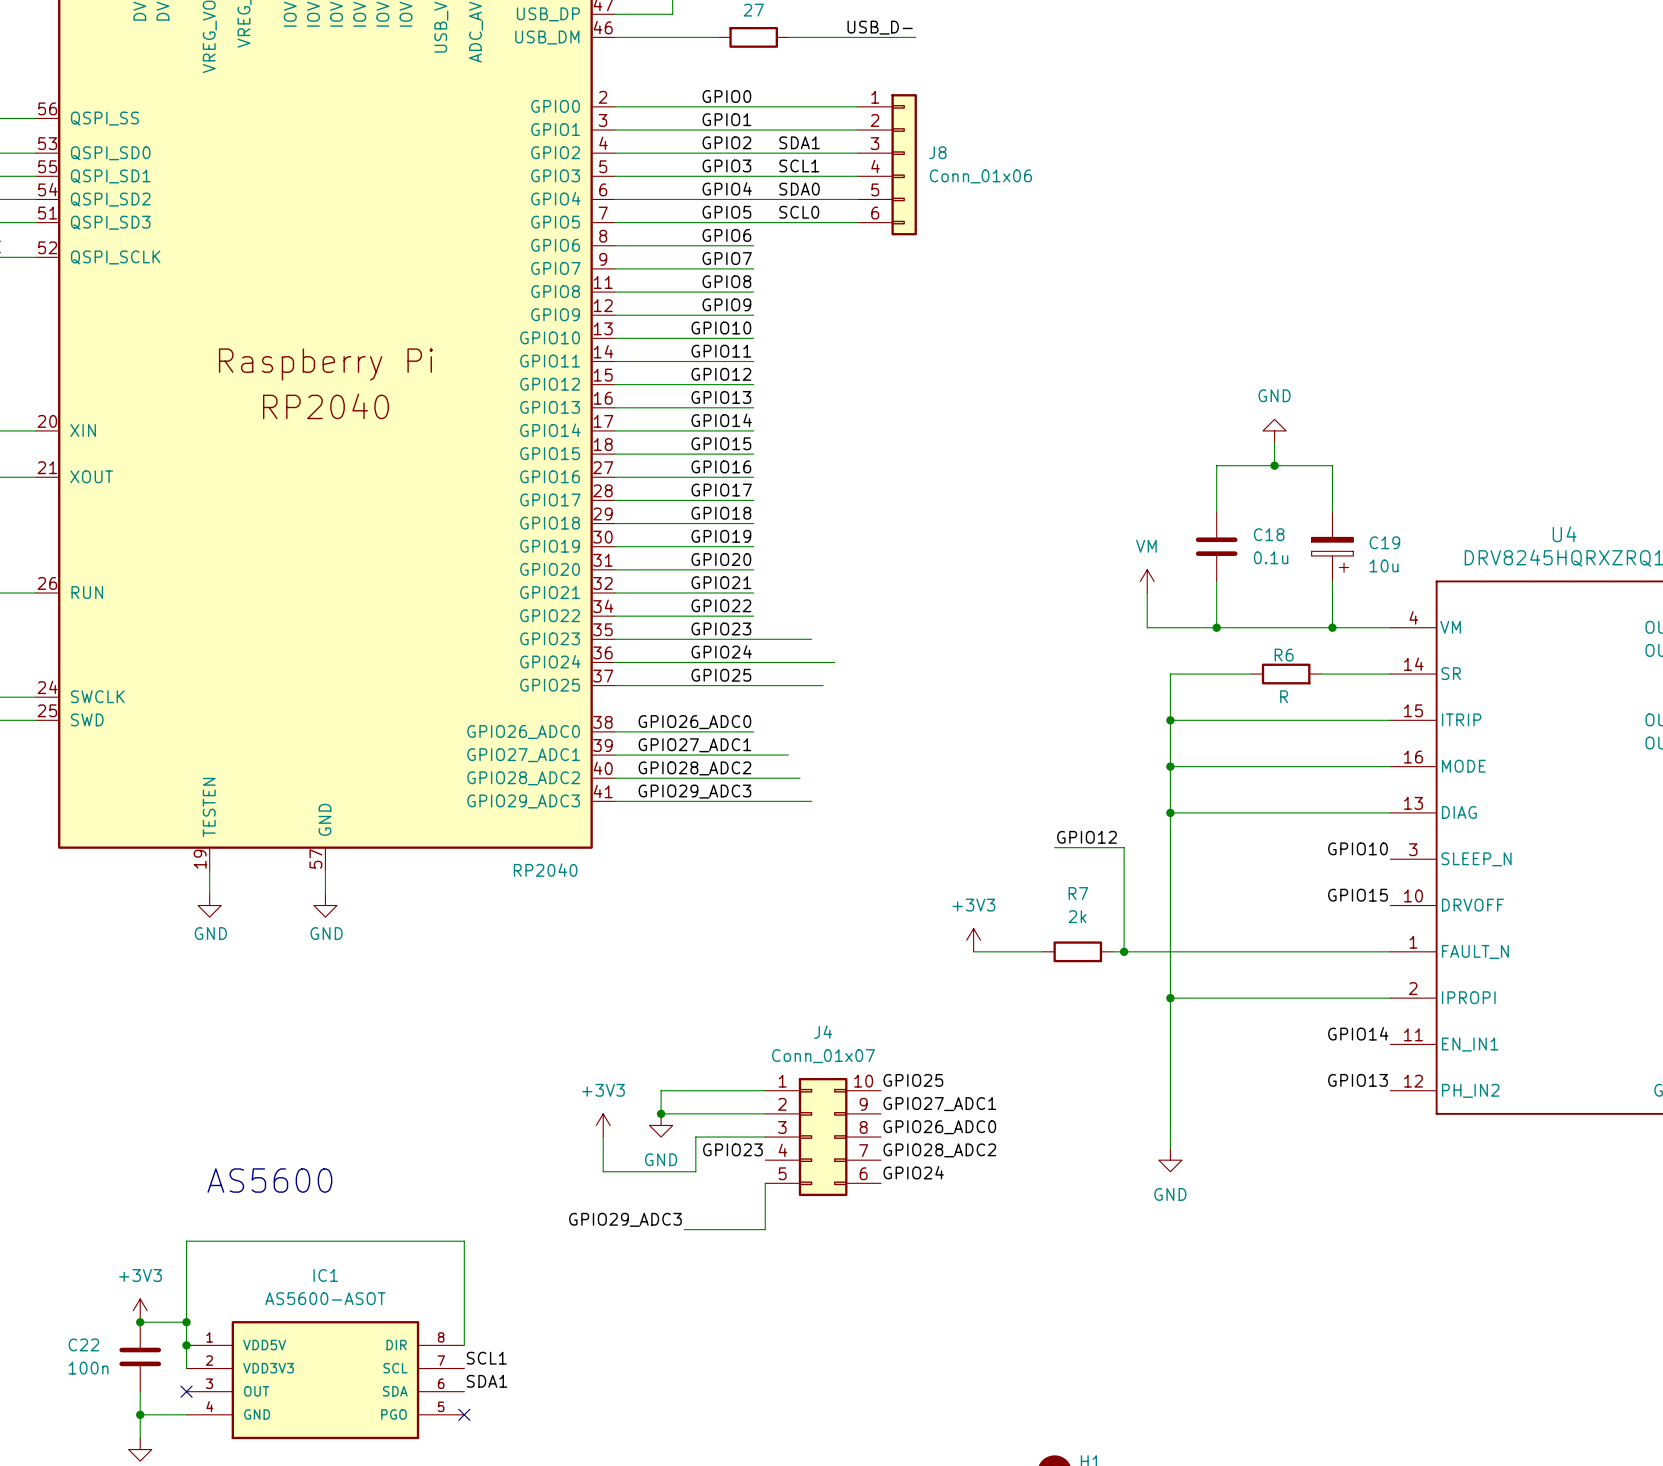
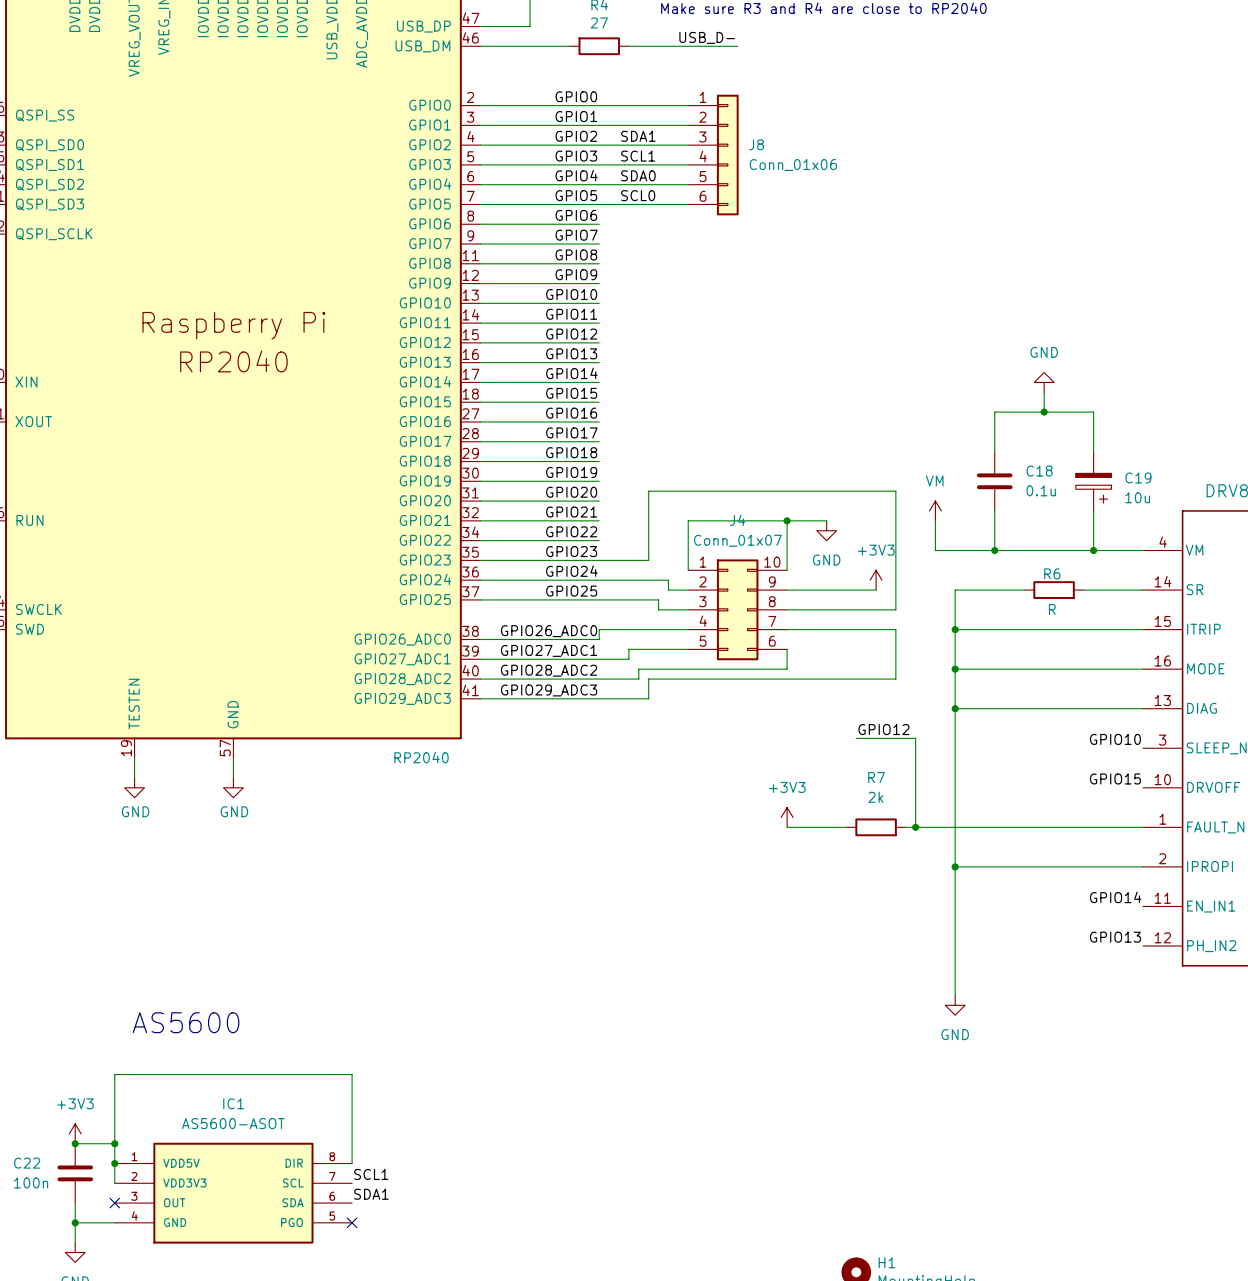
wire: none -> (787, 520) (787, 570)
junction: none -> (787, 520)
wire: none -> (826, 520) (688, 520) (688, 570)
power symbol: none -> GND (826, 530)
wire: none -> (648, 560) (648, 491) (895, 491) (895, 609) (787, 609)
wire: none -> (668, 580) (668, 590) (688, 590)
power symbol: none -> +3V3 (876, 580)
wire: none -> (787, 590) (876, 590)
wire: none -> (658, 599) (658, 609) (688, 609)
wire: none -> (688, 629) (599, 629) (599, 639)
wire: none -> (787, 629) (895, 629) (895, 679) (648, 679) (648, 698)
wire: none -> (688, 649) (628, 649) (628, 659)
wire: none -> (787, 649) (787, 669) (638, 669) (638, 679)
label: GPIO25 (913, 1080) -> none
wire: (765, 1090) (661, 1090) (661, 1113) (765, 1113) -> none
label: GPIO27_ADC1 (939, 1104) -> none
junction: (661, 1113) -> none
power symbol: +3V3 (603, 1125) -> none
power symbol: GND (661, 1125) -> none
label: GPIO26_ADC0 (939, 1127) -> none
wire: (603, 1137) (603, 1171) (695, 1171) (695, 1137) (765, 1137) -> none
J4 position: (823, 1137) -> (737, 609)
label: GPIO23 (732, 1149) -> none
label: GPIO28_ADC2 (939, 1150) -> none
label: GPIO24 (913, 1172) -> none
wire: (765, 1183) (765, 1229) (684, 1229) -> none
label: GPIO29_ADC3 (625, 1219) -> none

